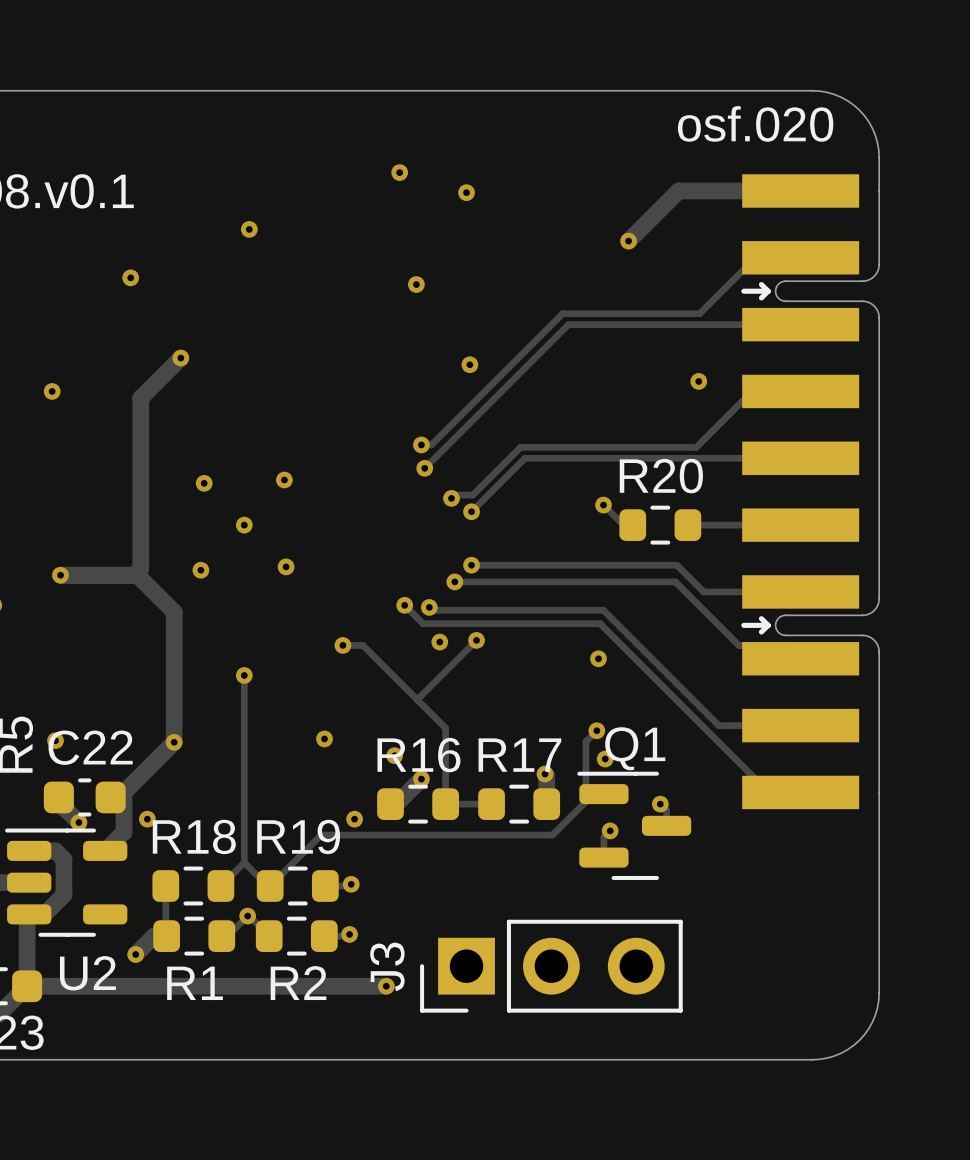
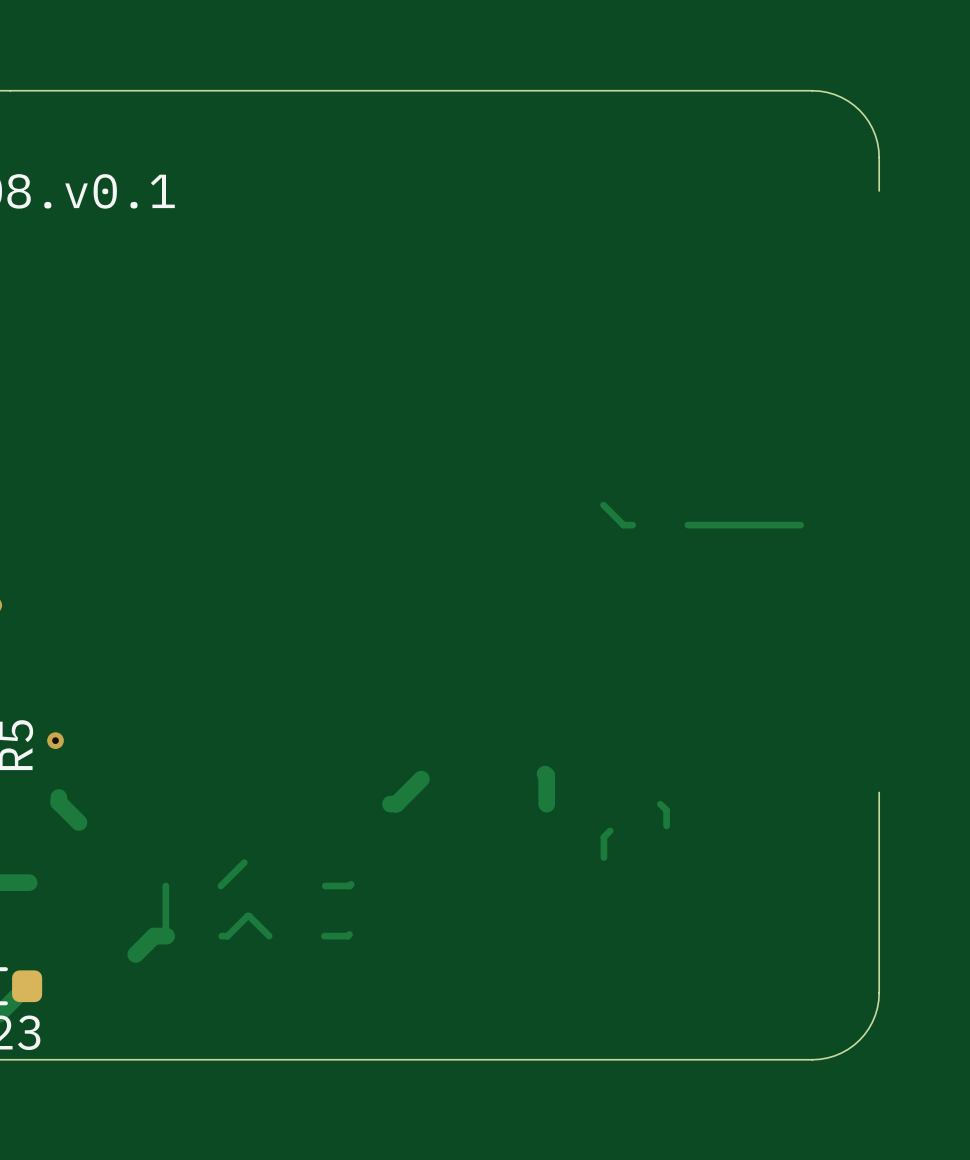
text: osf.020 (755, 123) -> none
via: (399, 172) -> none
track: (800, 190) (678, 190) (628, 241) -> none
via: (466, 192) -> none
via: (249, 229) -> none
via: (628, 241) -> none
track: (800, 257) (755, 257) (699, 313) (562, 313) (431, 444) (421, 444) -> none
via: (130, 277) -> none
via: (416, 284) -> none
track: (800, 324) (568, 324) (424, 468) -> none
track: (180, 358) (140, 398) (140, 568) (134, 575) -> none
via: (180, 358) -> none
via: (469, 364) -> none
via: (698, 381) -> none
via: (52, 391) -> none
track: (800, 391) (752, 391) (696, 447) (520, 447) (472, 495) (454, 495) (451, 498) -> none
via: (421, 444) -> none
track: (800, 458) (524, 458) (471, 511) -> none
via: (424, 468) -> none
via: (284, 480) -> none
via: (204, 483) -> none
part: (810, 491) -> none
via: (451, 498) -> none
via: (603, 505) -> none
via: (471, 511) -> none
via: (244, 525) -> none
R20: (660, 525) -> none
track: (471, 565) (677, 565) (703, 591) (800, 591) -> none
via: (471, 565) -> none
via: (286, 566) -> none
via: (200, 570) -> none
track: (60, 575) (137, 575) (174, 611) (174, 742) (124, 792) (124, 832) (105, 850) -> none
via: (60, 575) -> none
track: (454, 581) (675, 581) (739, 645) (787, 645) (800, 658) -> none
via: (454, 581) -> none
track: (404, 605) (423, 623) (600, 623) (768, 792) (800, 792) -> none
via: (404, 605) -> none
track: (429, 607) (432, 610) (603, 610) (718, 725) (800, 725) -> none
via: (429, 607) -> none
track: (476, 640) (418, 700) -> none
via: (476, 640) -> none
via: (439, 642) -> none
track: (342, 645) (362, 645) (445, 728) (445, 804) (491, 804) -> none
via: (342, 645) -> none
via: (598, 658) -> none
track: (244, 675) (244, 862) (267, 885) (270, 885) (321, 835) (552, 835) (585, 801) (585, 741) (596, 730) -> none
via: (244, 675) -> none
via: (596, 730) -> none
via: (324, 738) -> none
via: (174, 742) -> none
via: (394, 755) -> none
via: (605, 759) -> none
via: (545, 774) -> none
via: (421, 779) -> none
C22: (84, 797) -> none
R16: (418, 804) -> none
R17: (519, 804) -> none
via: (660, 804) -> none
via: (147, 819) -> none
via: (354, 819) -> none
via: (78, 822) -> none
Q1: (634, 825) -> none
via: (610, 830) -> none
track: (29, 850) (55, 850) (63, 859) (63, 894) (44, 914) (29, 914) (27, 916) (27, 986) (386, 986) -> none
U2: (66, 882) -> none
via: (351, 884) -> none
R18: (193, 885) -> none
R19: (297, 885) -> none
via: (247, 916) -> none
via: (349, 934) -> none
R1: (194, 936) -> none
R2: (296, 936) -> none
via: (135, 954) -> none
J3: (551, 966) -> none
via: (386, 986) -> none

